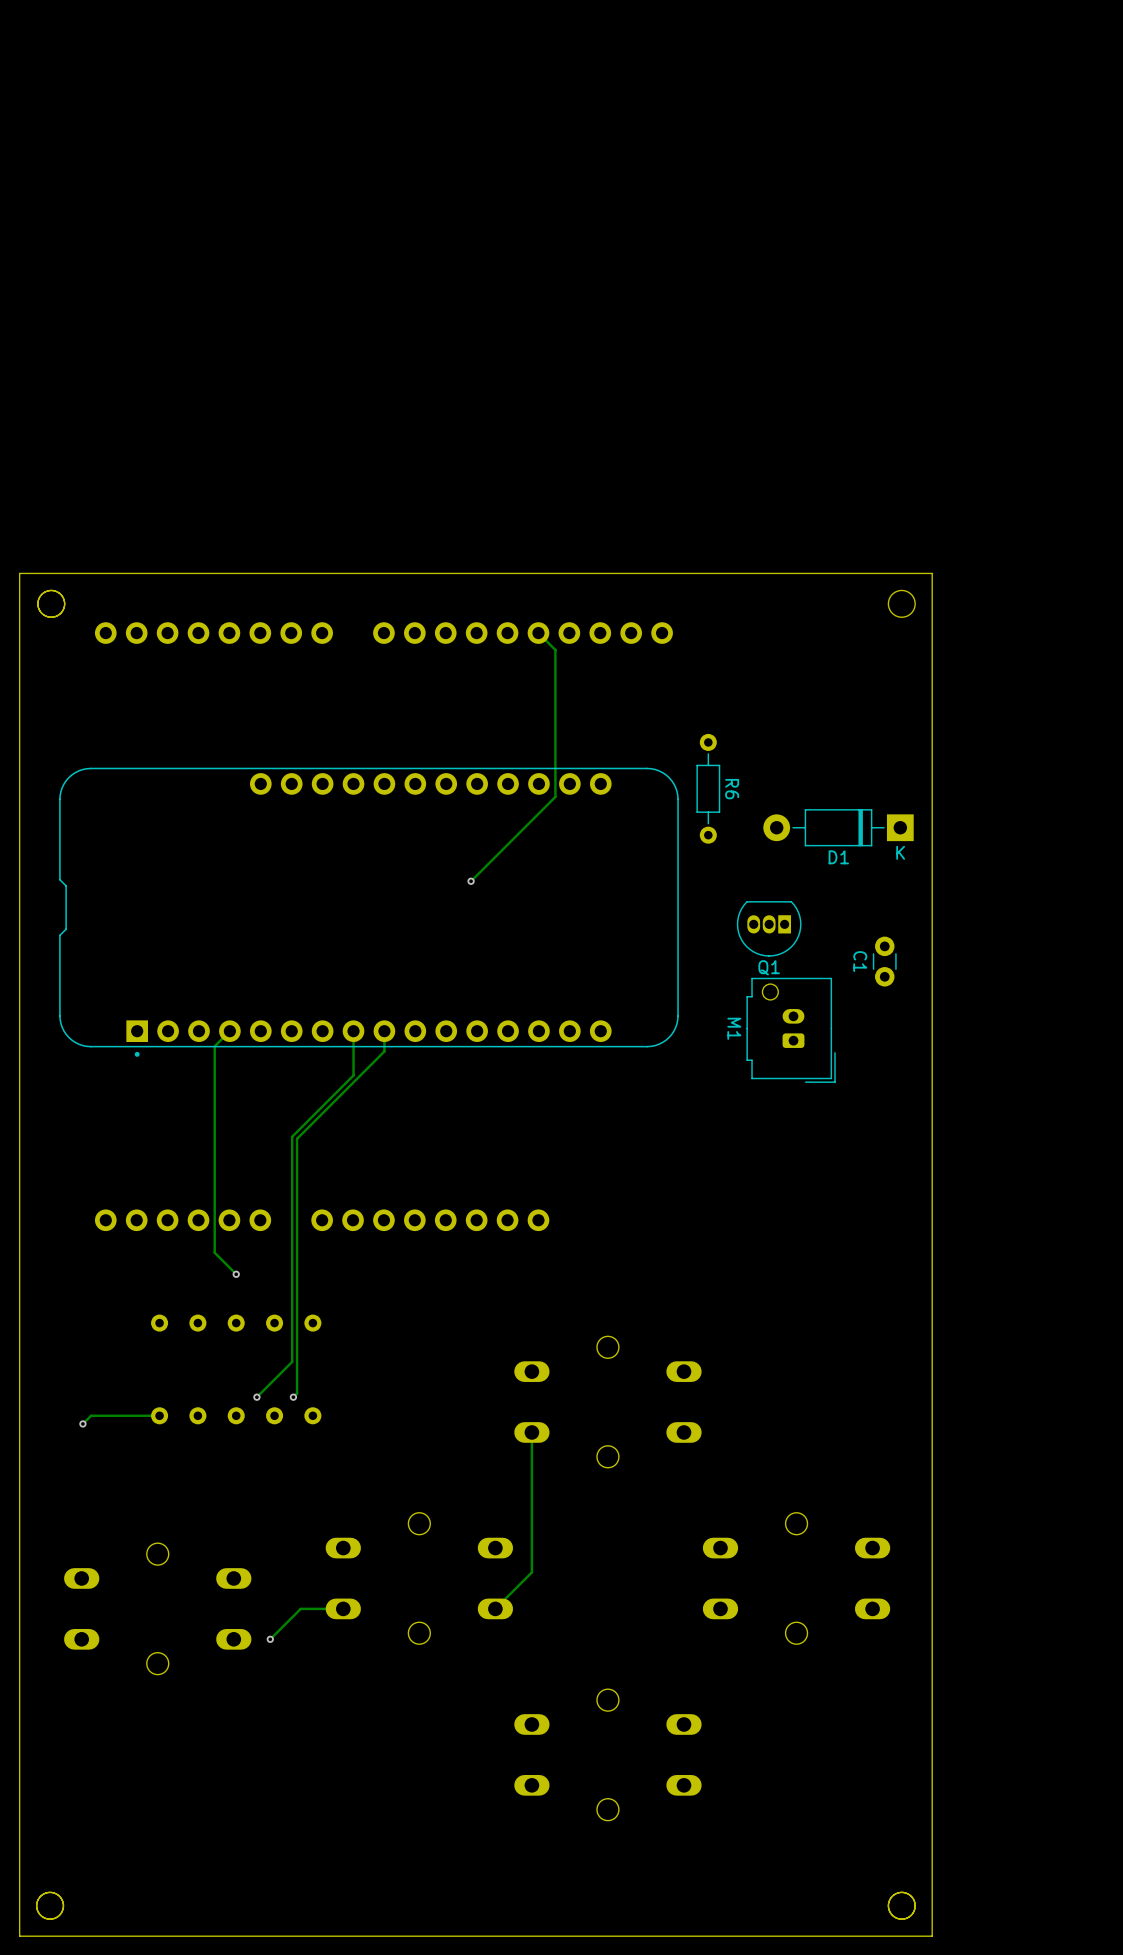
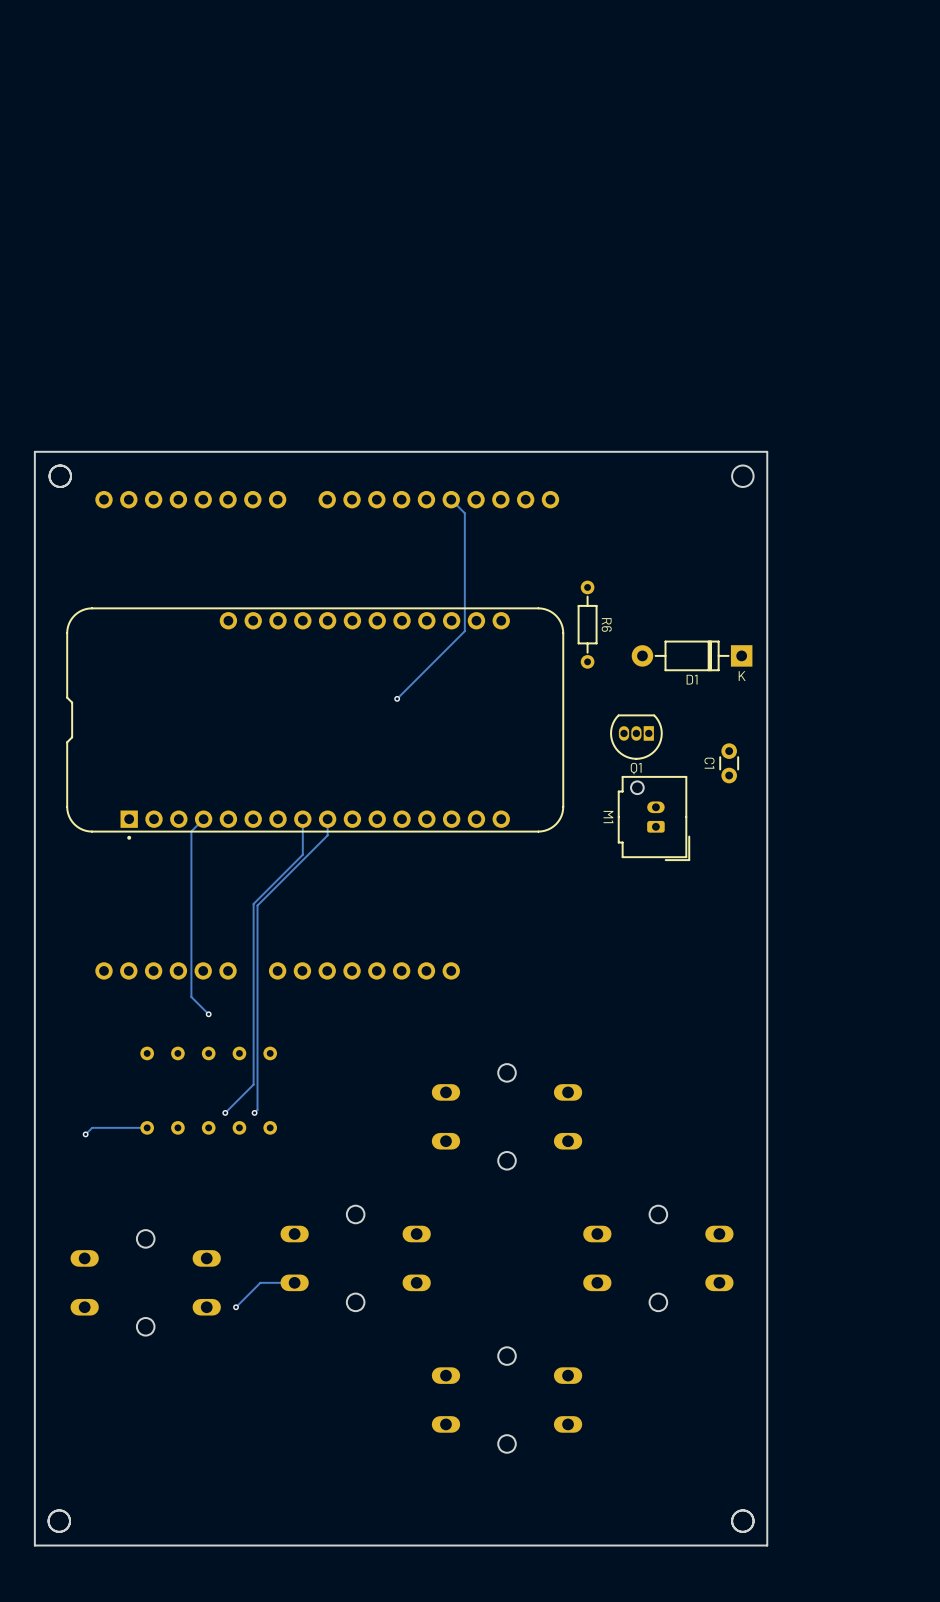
track: (531, 1432) (531, 1572) (495, 1608) -> none

